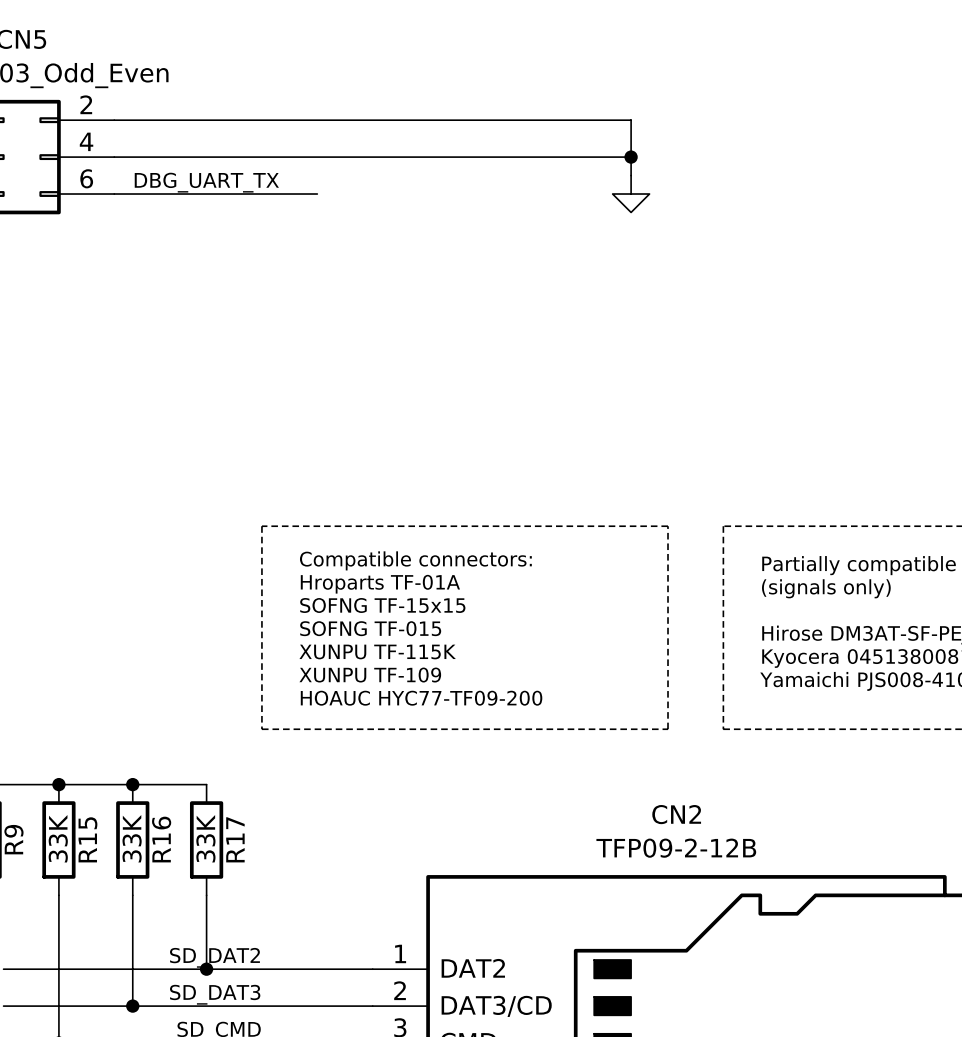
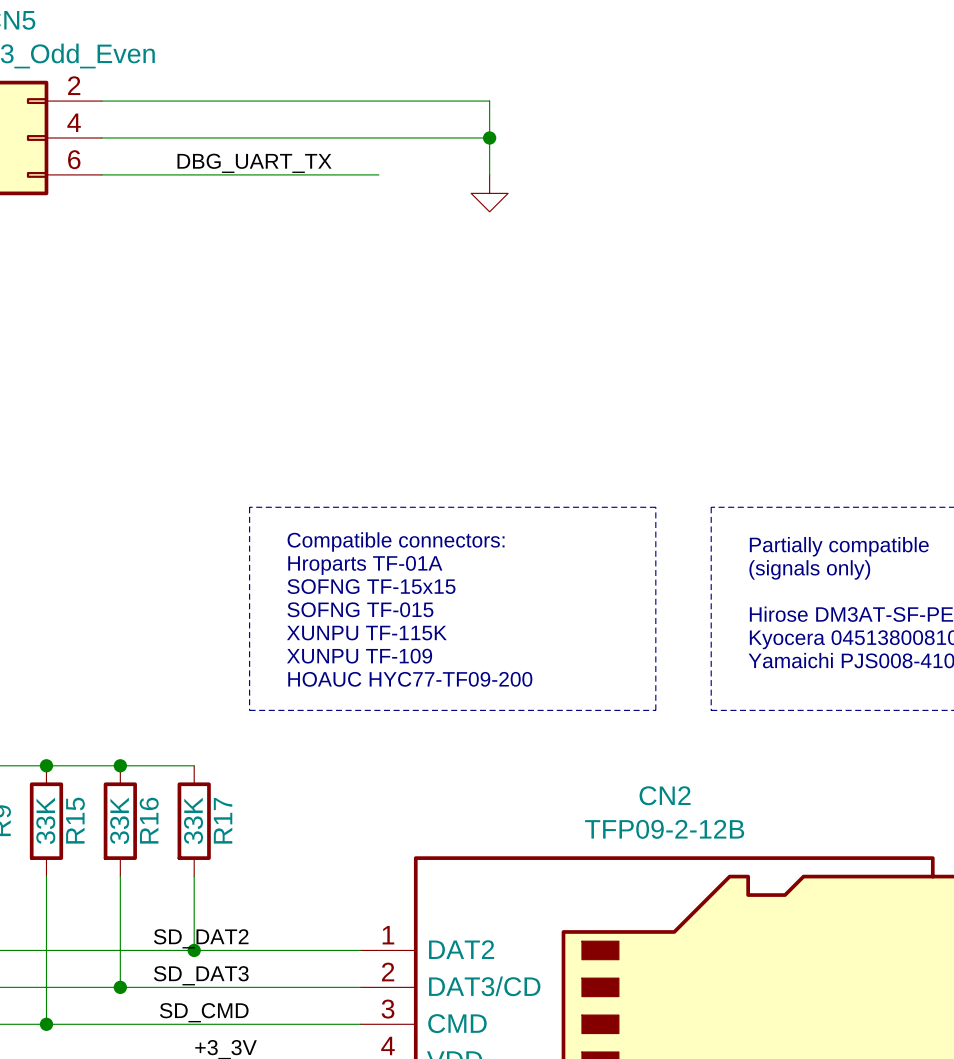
wire: (501, 120) (631, 120) (631, 175) -> (489, 101) (489, 174)
wire: (501, 157) (631, 157) -> none
junction: none -> (489, 137)
junction: (631, 157) -> none
label position: DBG_UART_TX (206, 182) -> DBG_UART_TX (254, 163)
wire: none -> (304, 174) (378, 174)
power symbol position: (631, 194) -> (489, 193)

